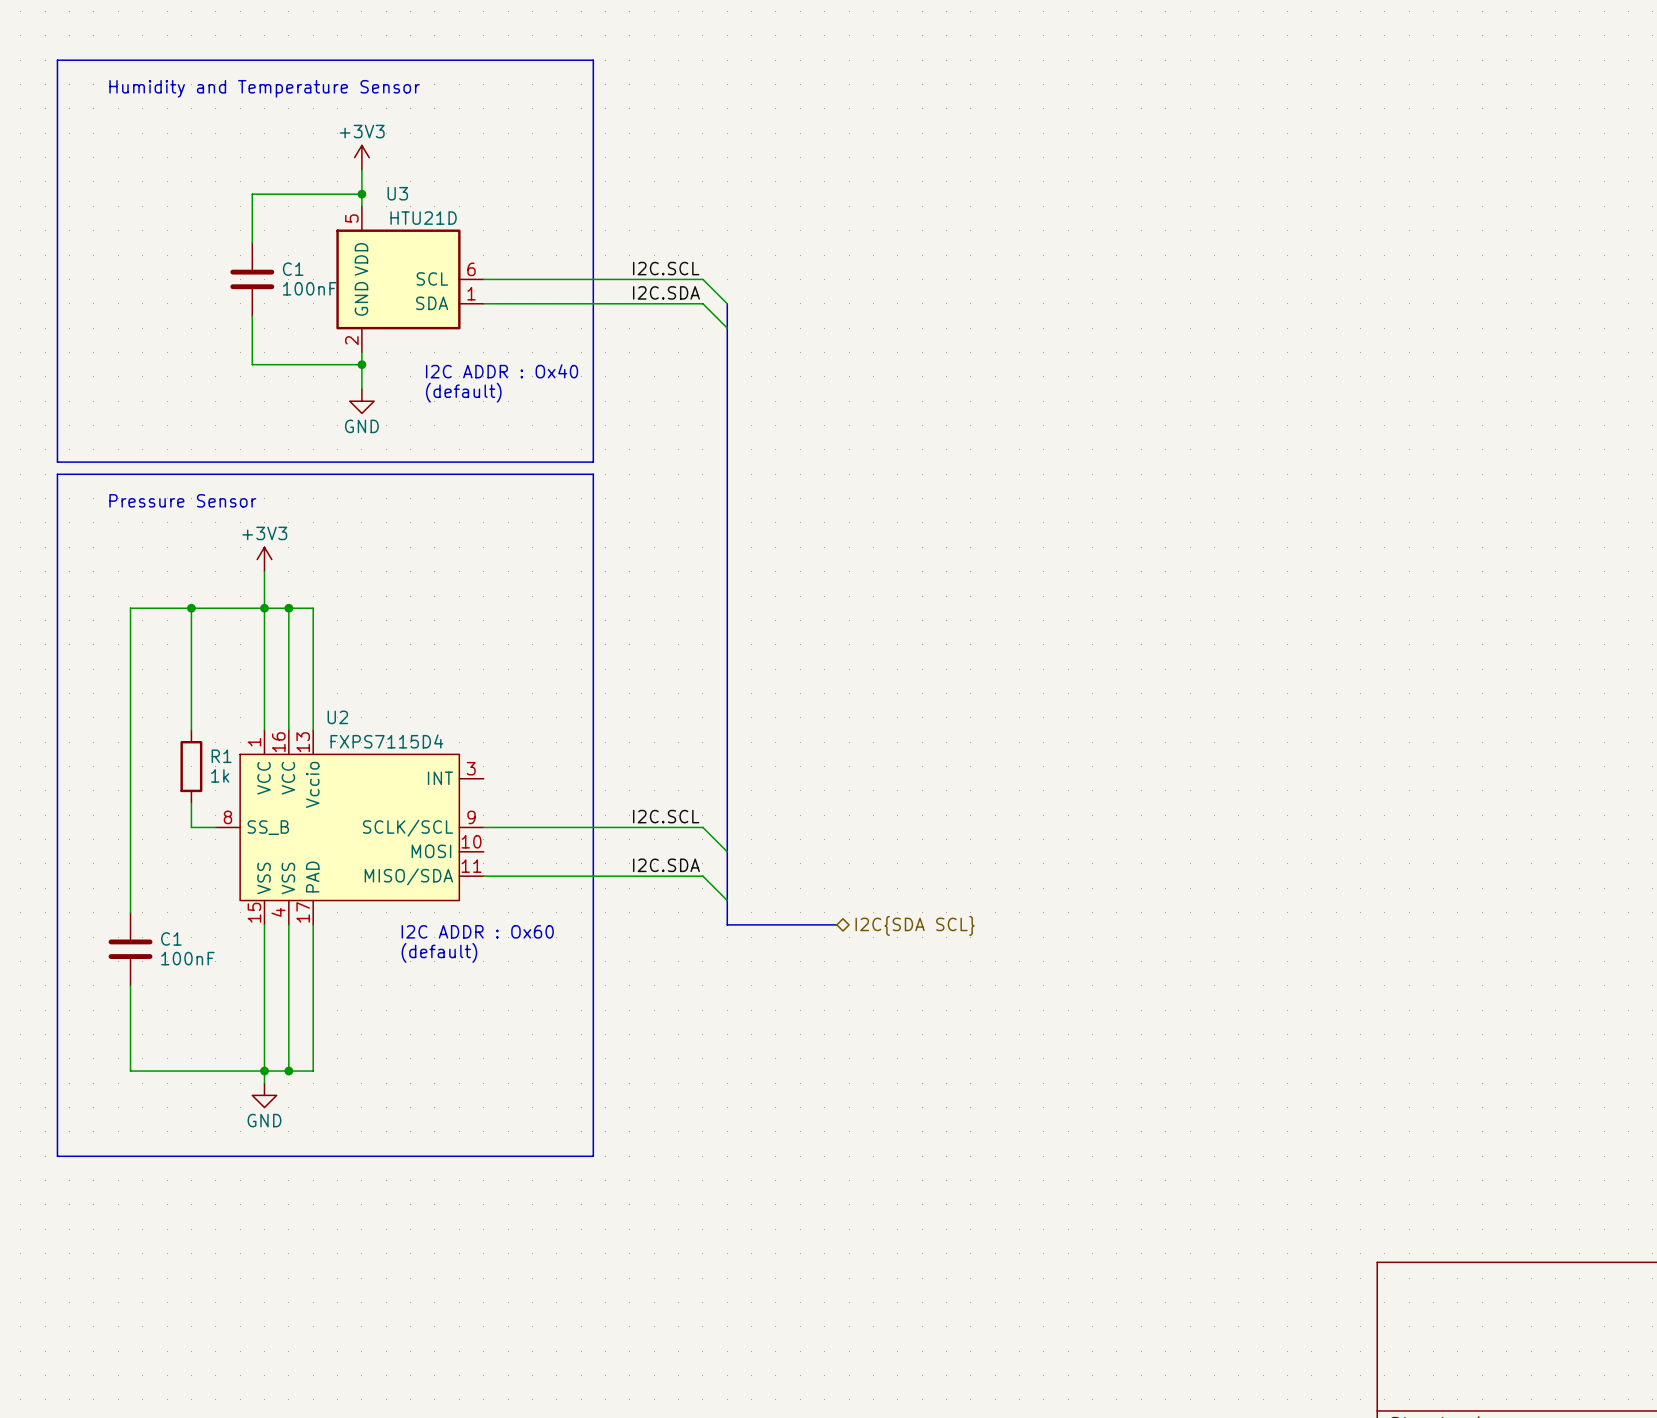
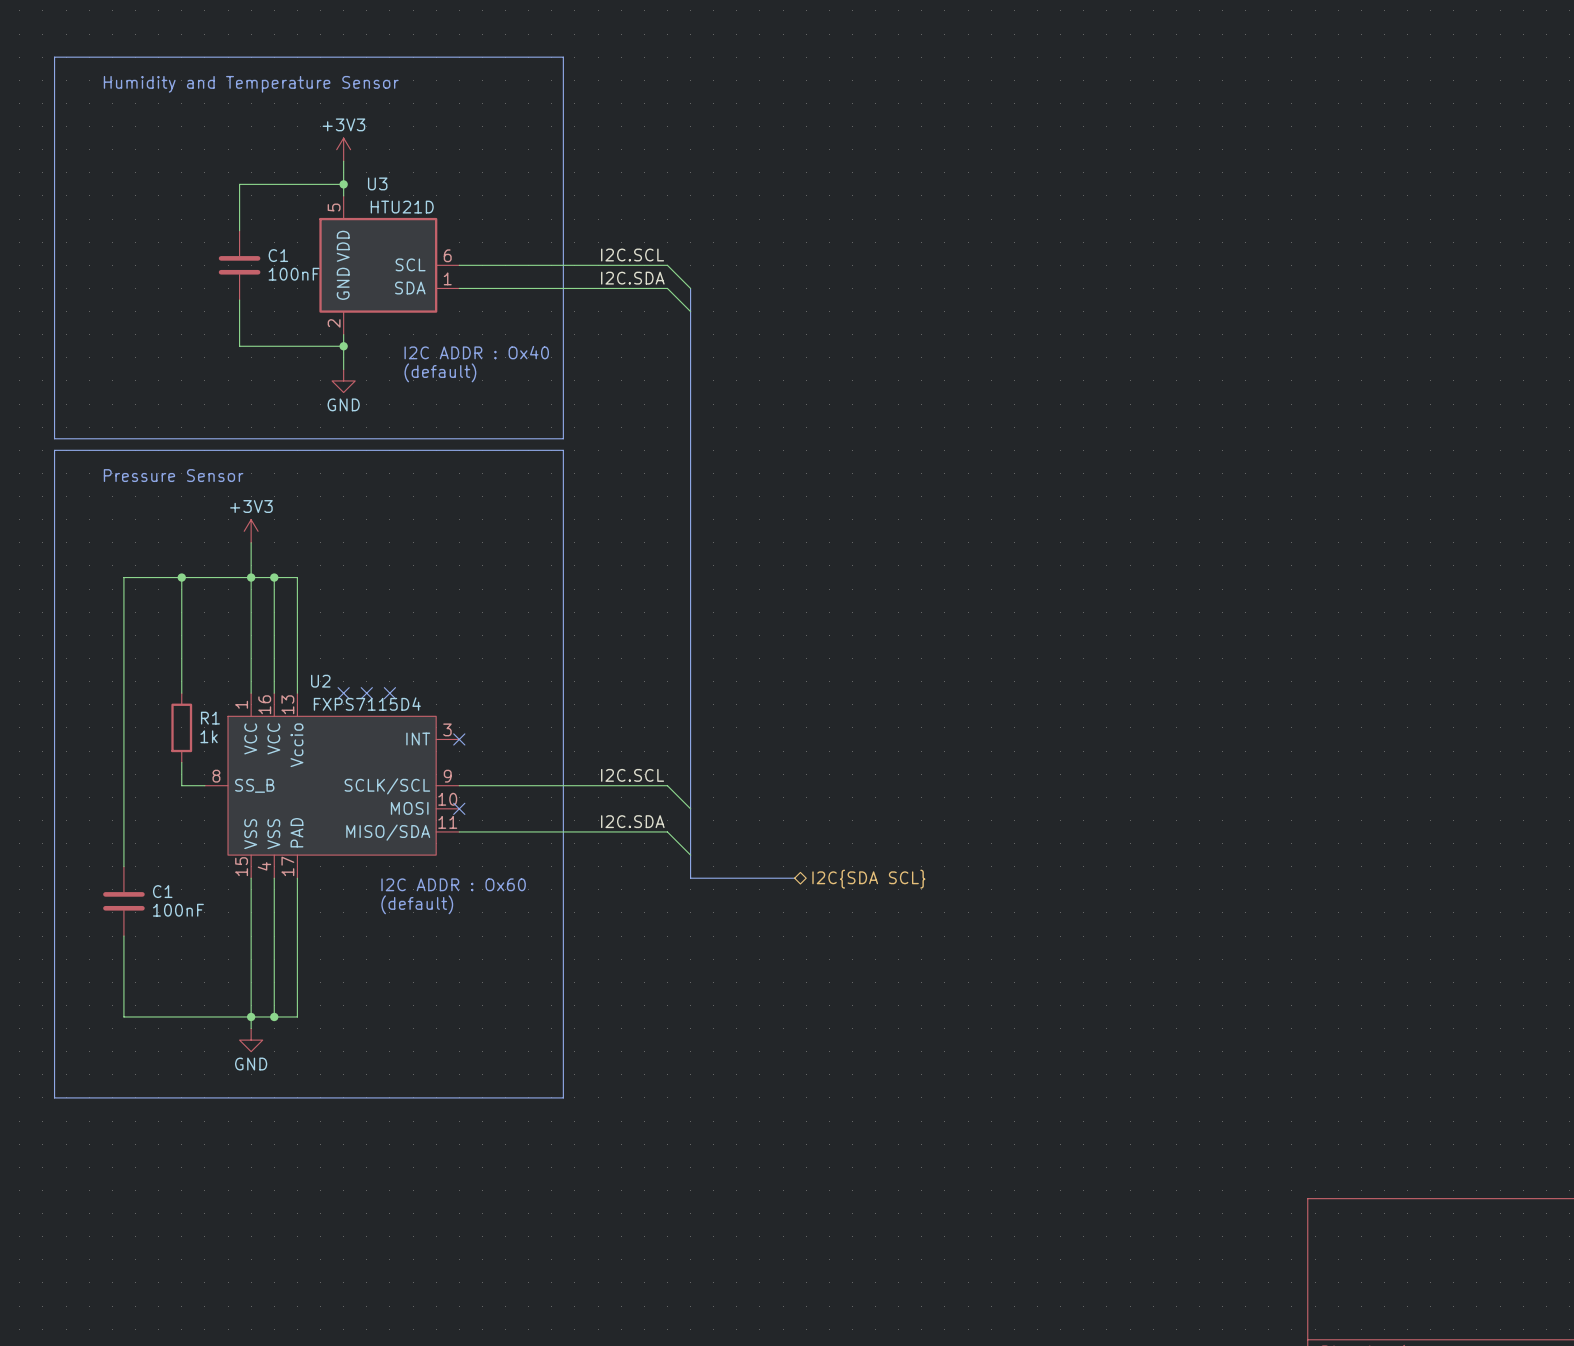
no-connect mark: none -> (343, 693)
no-connect mark: none -> (366, 693)
no-connect mark: none -> (389, 693)
no-connect mark: none -> (459, 739)
no-connect mark: none -> (459, 808)

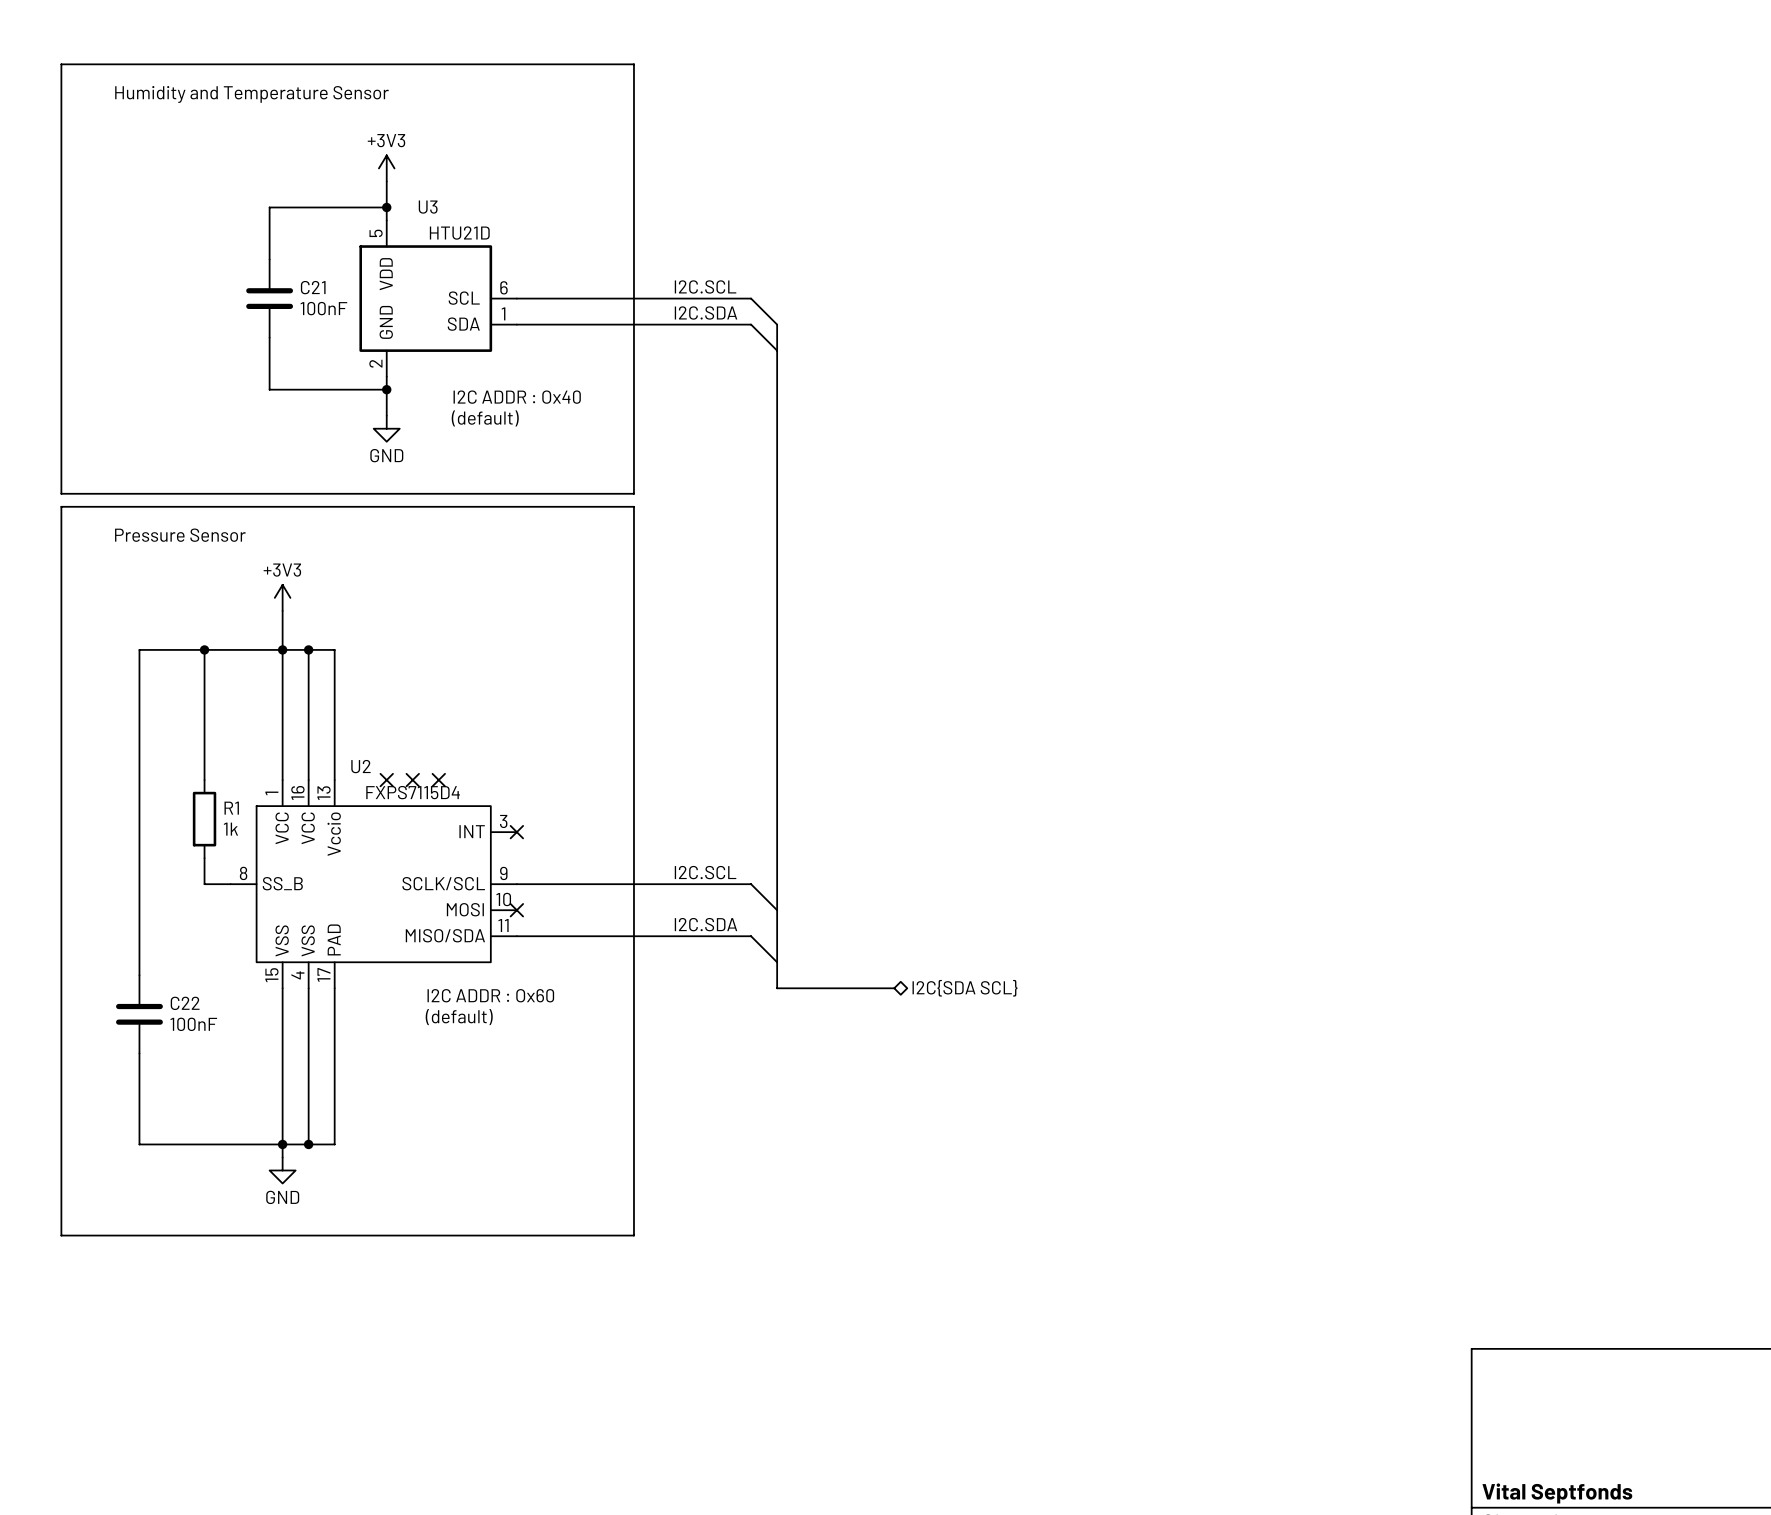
C1 name: C1 (278, 255) -> C21 (313, 287)
C1 name: C1 (162, 891) -> C22 (185, 1003)
title block: none -> Vital Septfonds (1557, 1493)

